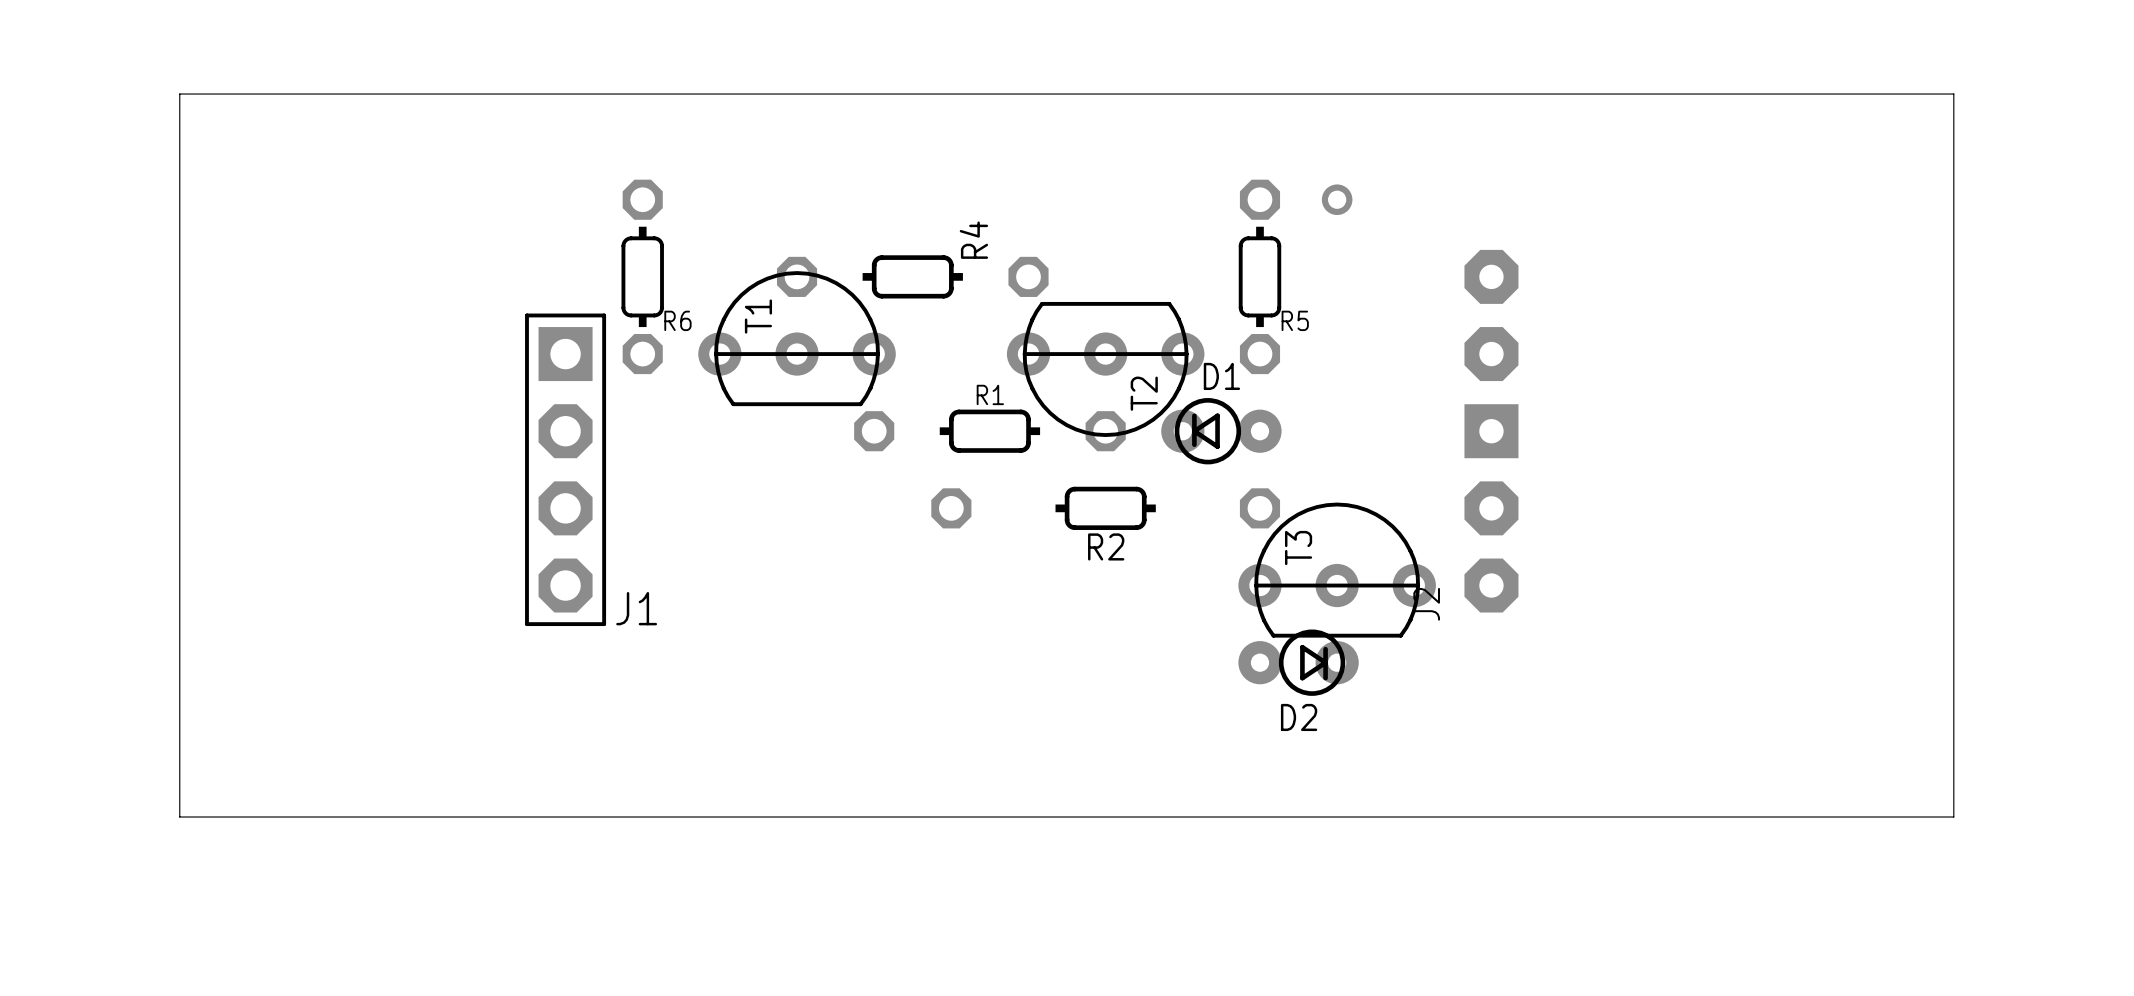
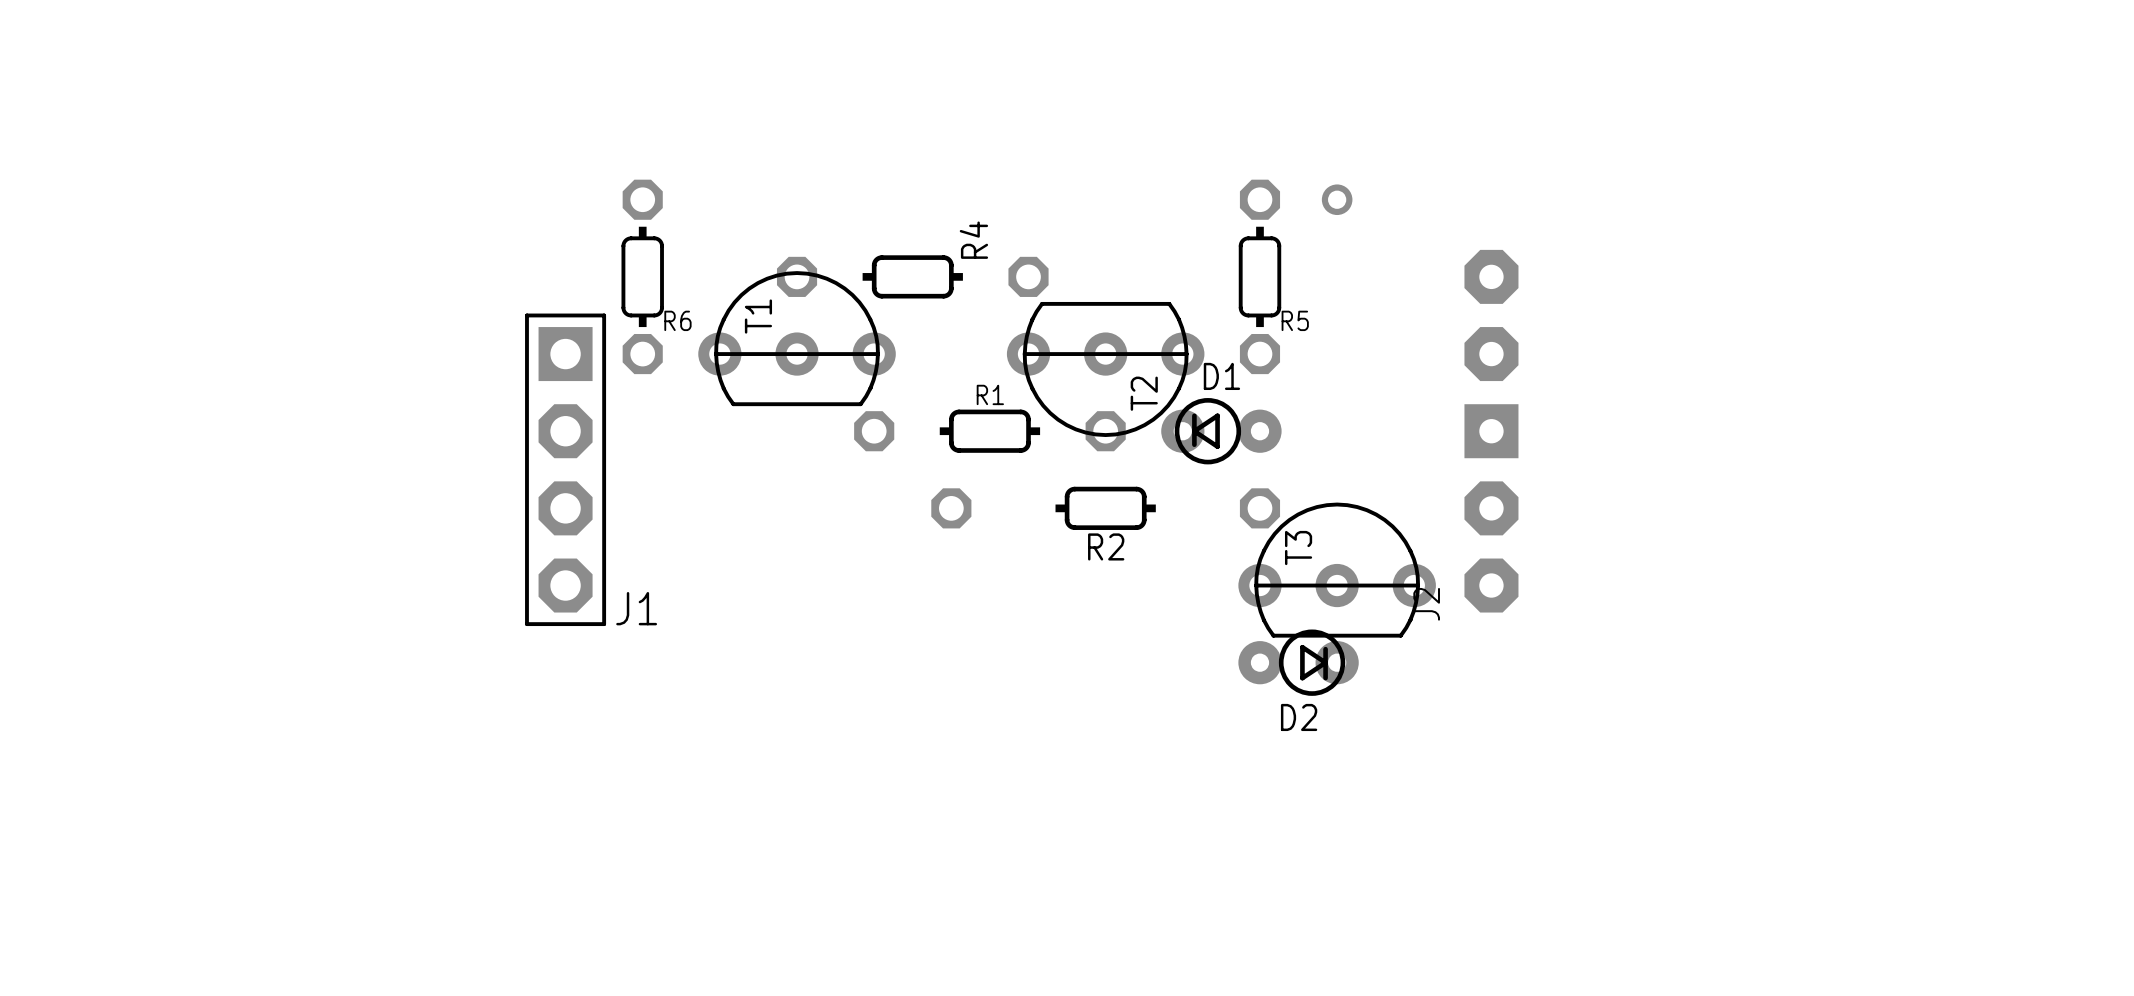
board edge: (179, 94) (1953, 94) (1953, 817) (179, 817) (179, 94) -> none

